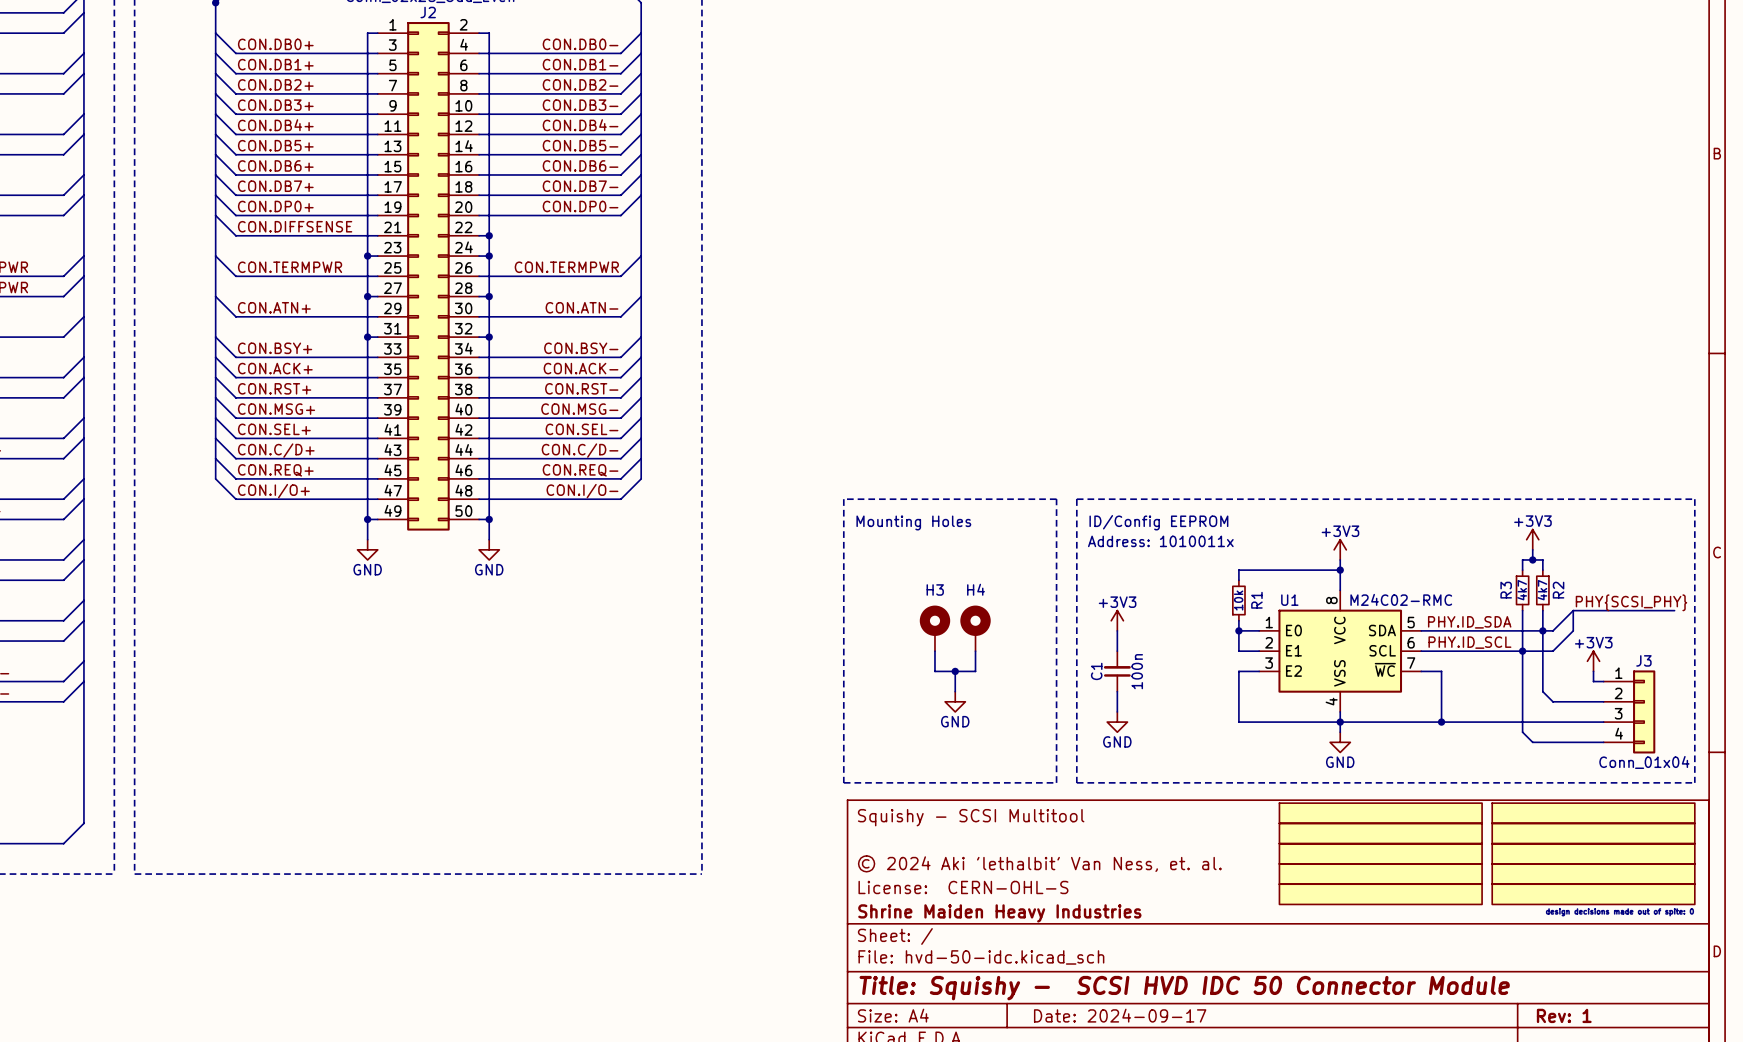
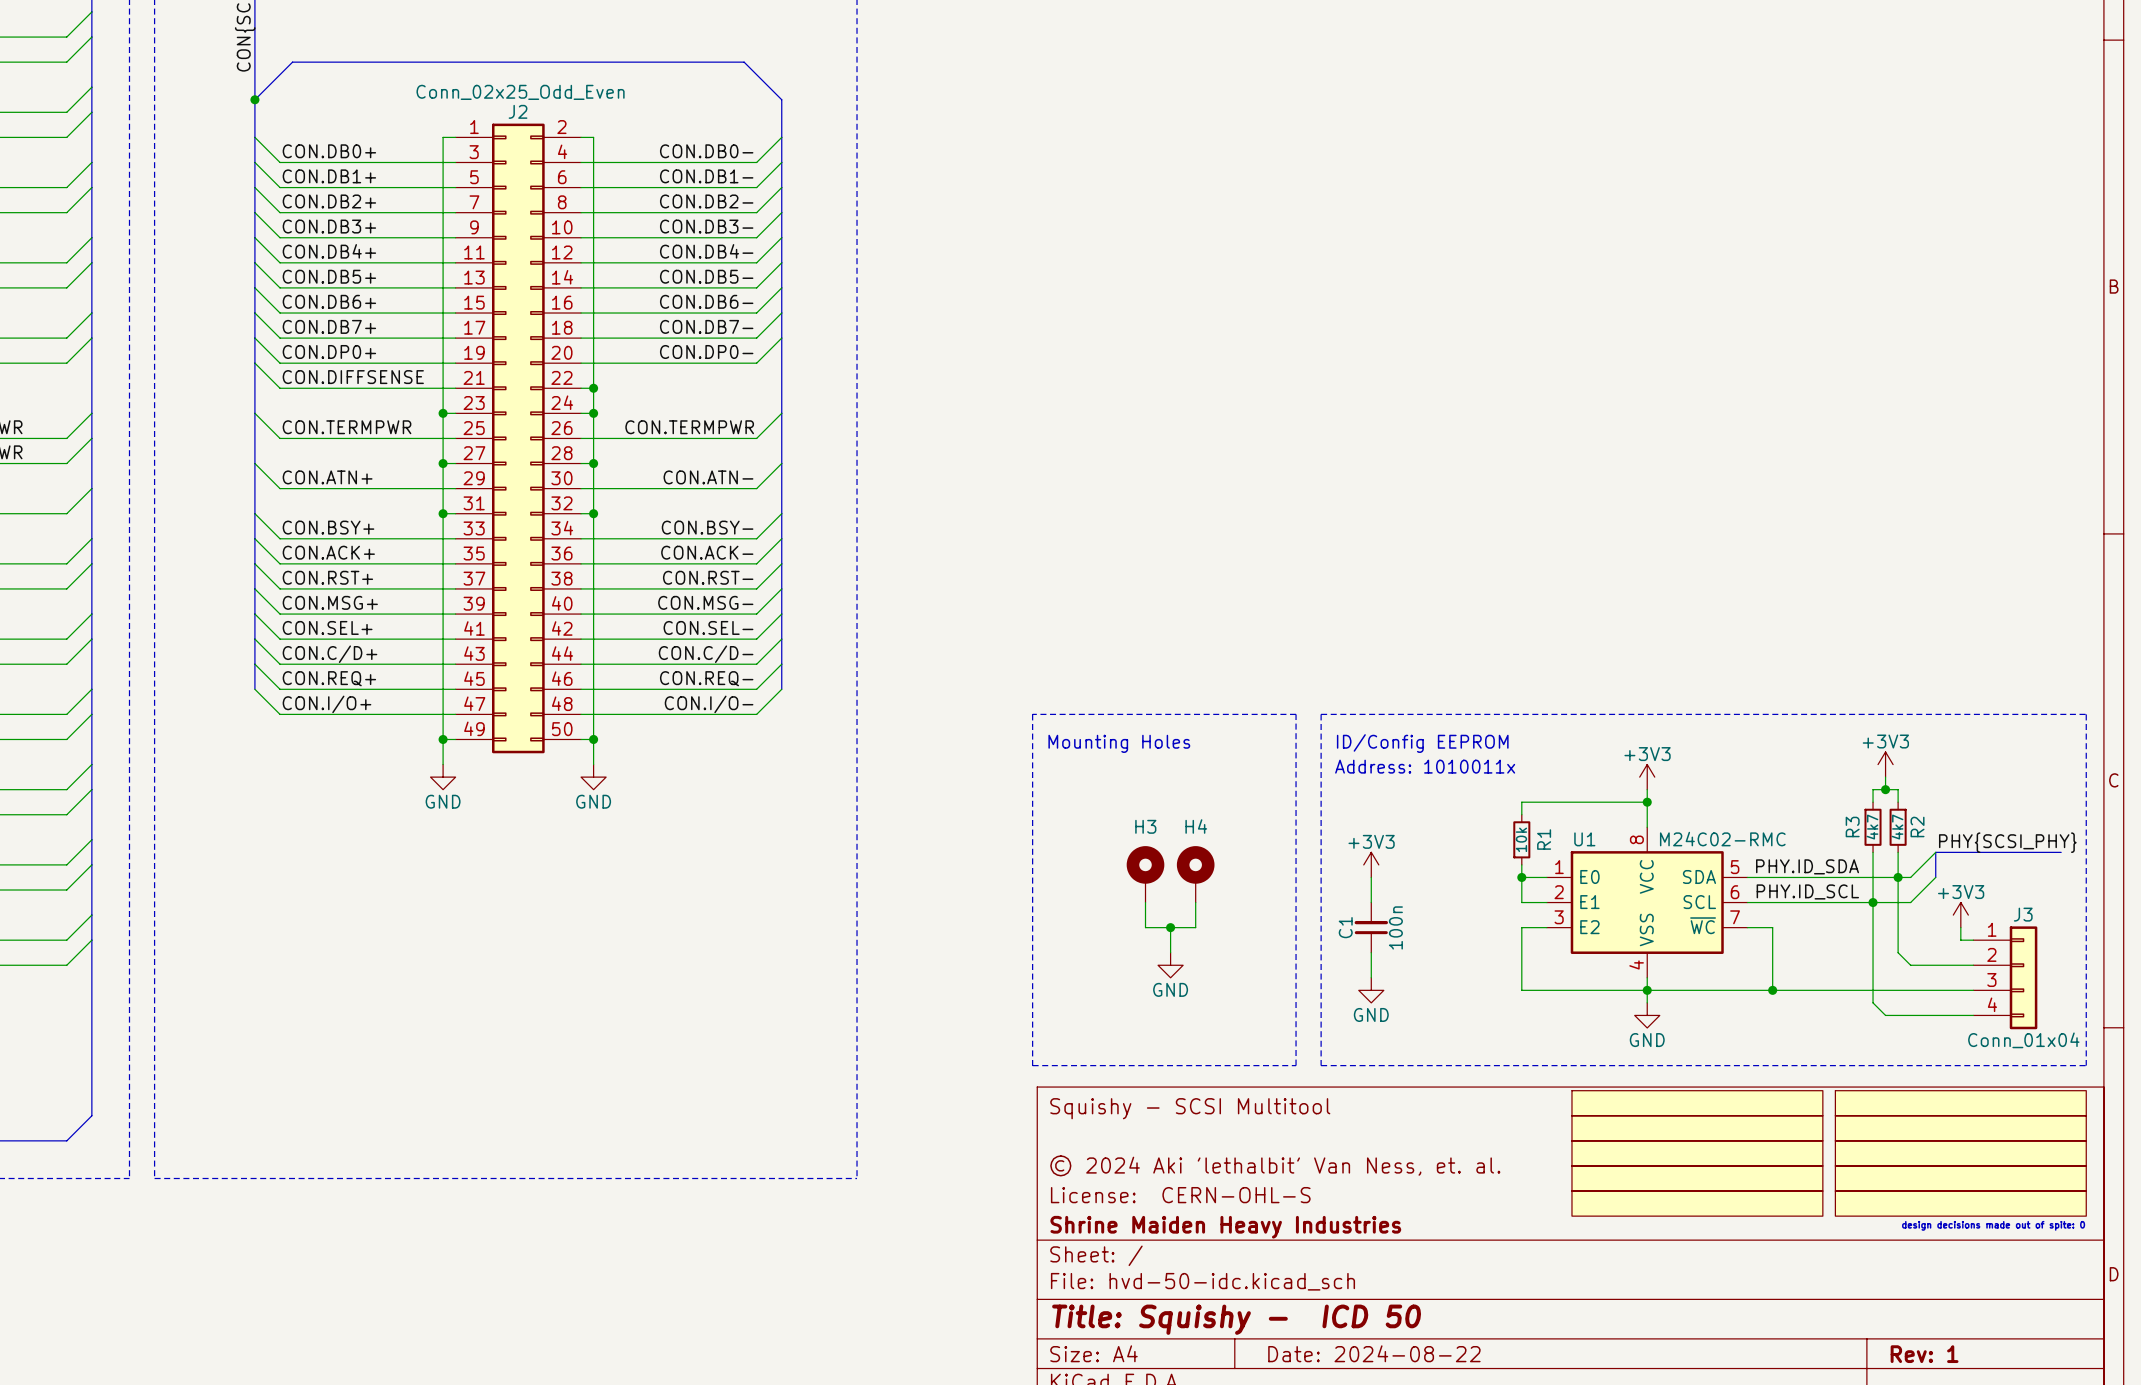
title block: Title: Squishy - SCSI HVD IDC 50 Connector Module (1184, 988) -> Title: Squishy - ICD 50 (1236, 1319)
title block: Date: 2024-09-17 (1120, 1015) -> Date: 2024-08-22 (1374, 1353)

